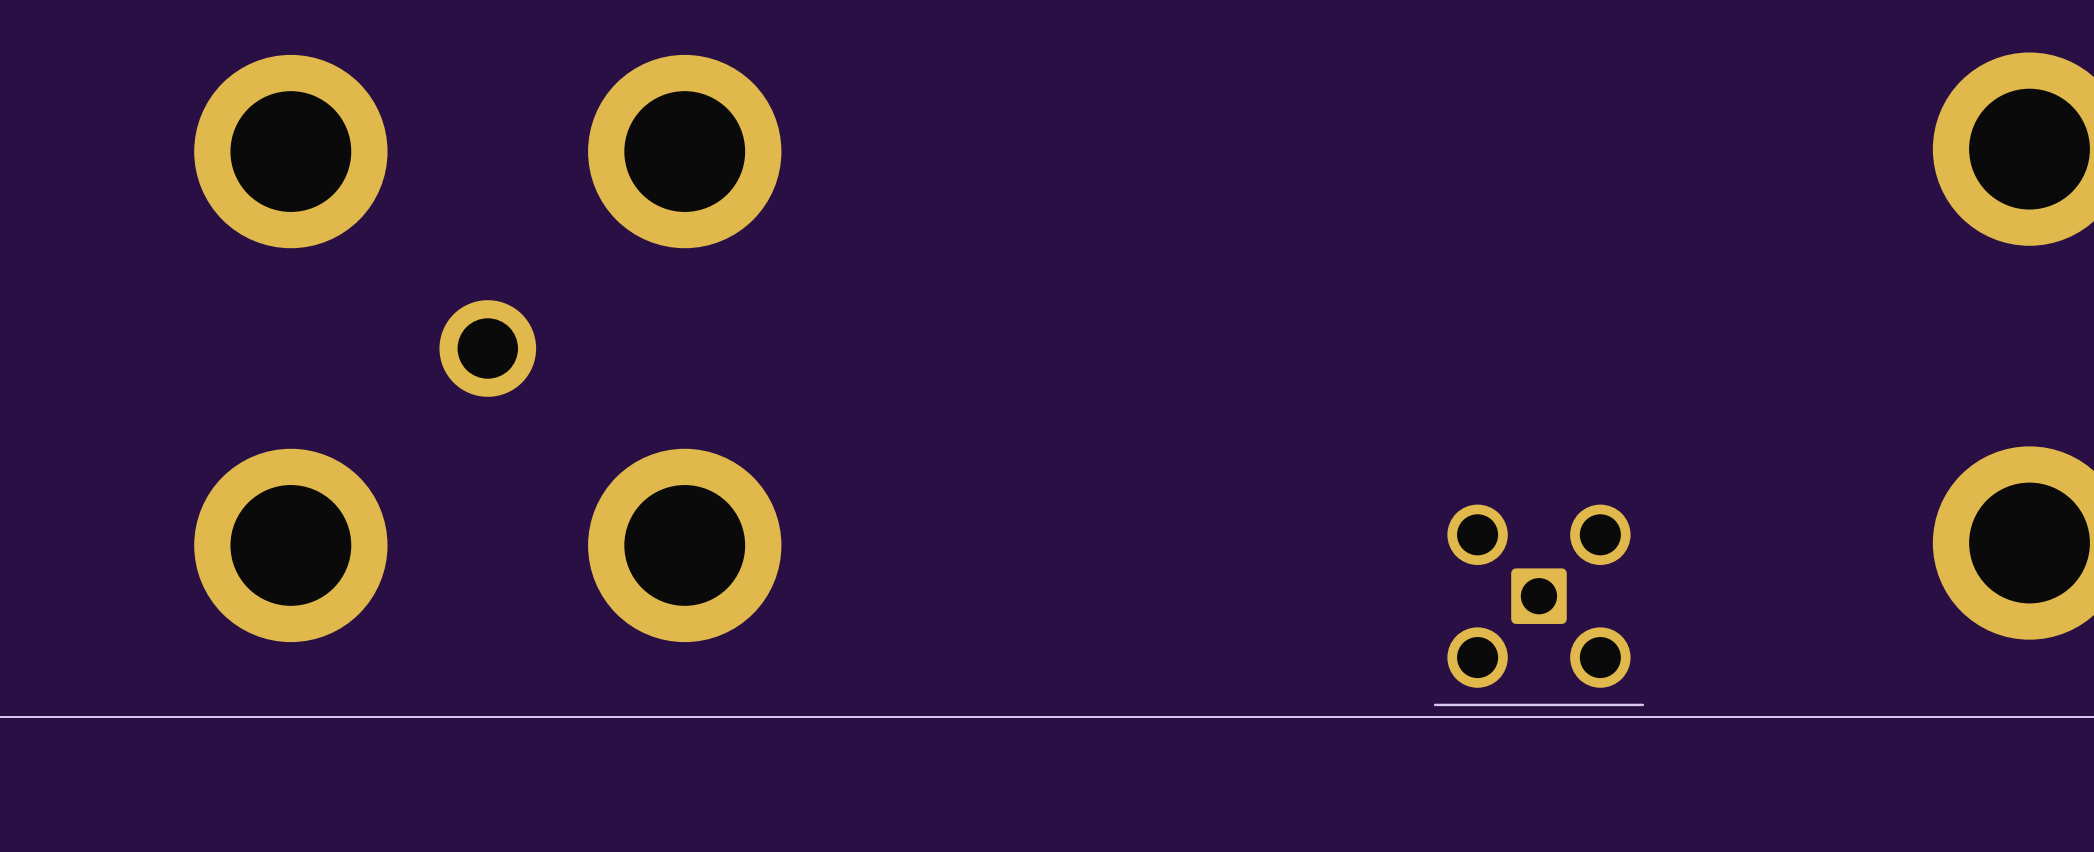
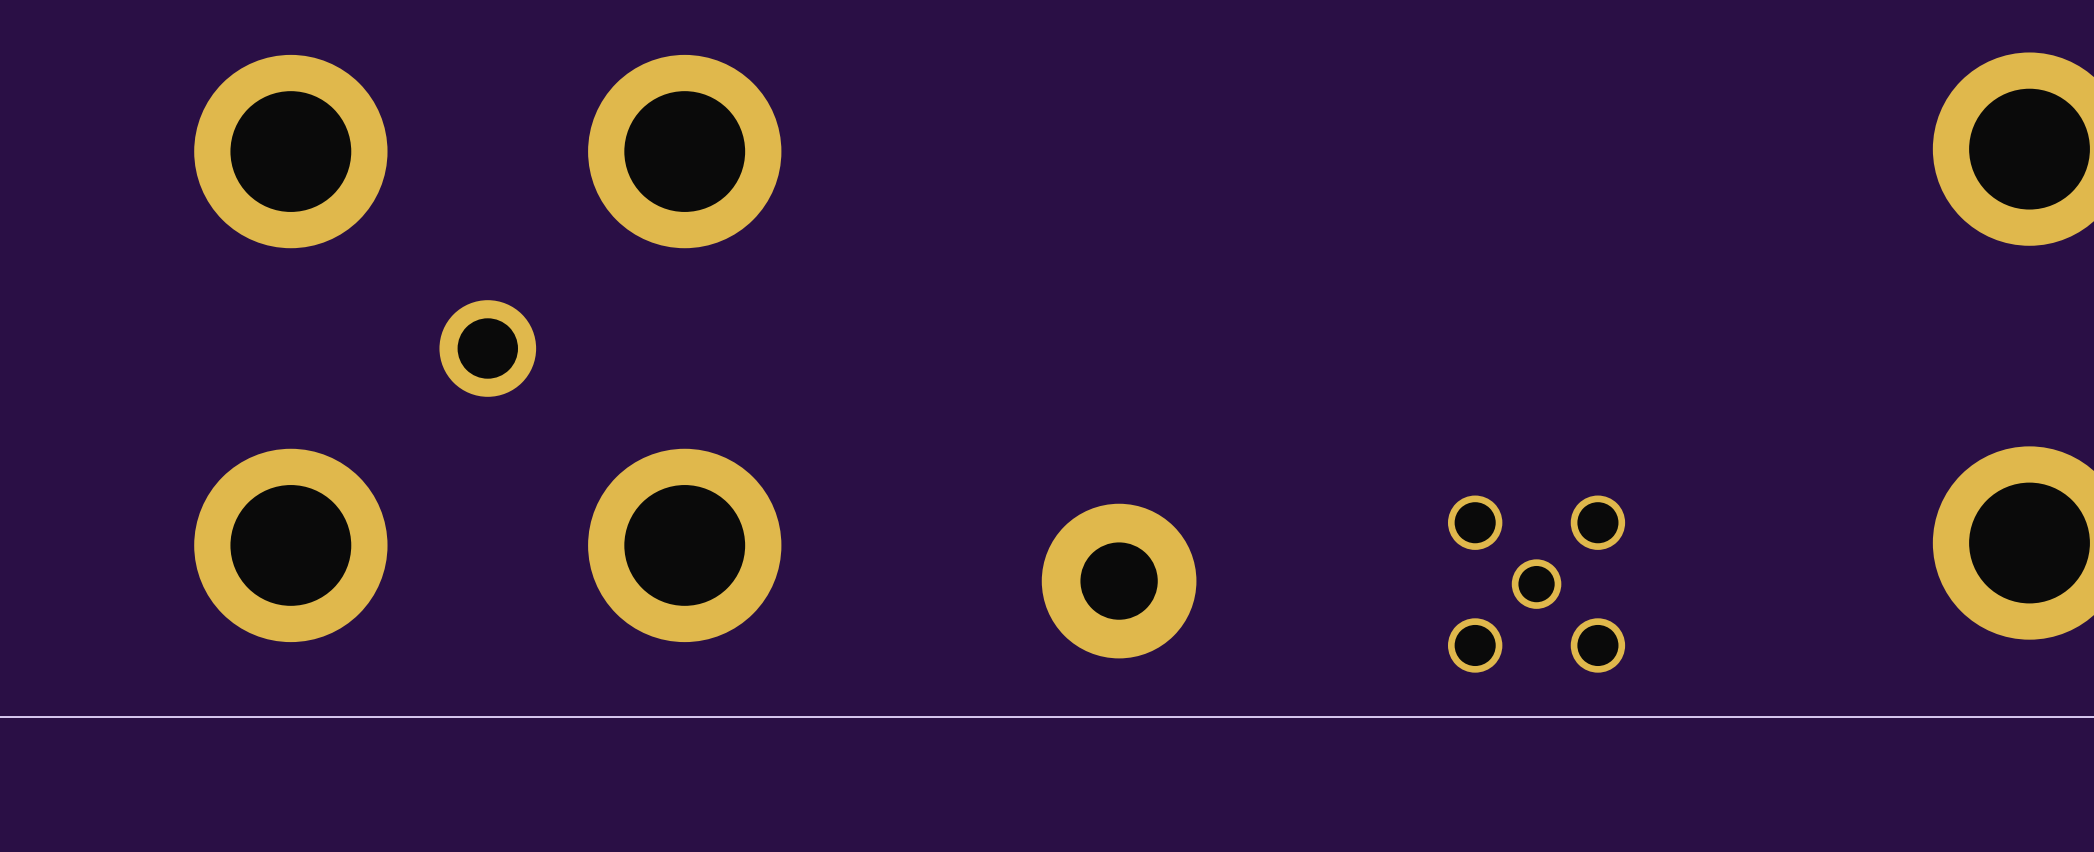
part footprint: [1433, 504, 1645, 707] -> [1447, 495, 1626, 673]
part: none -> (1119, 581)

